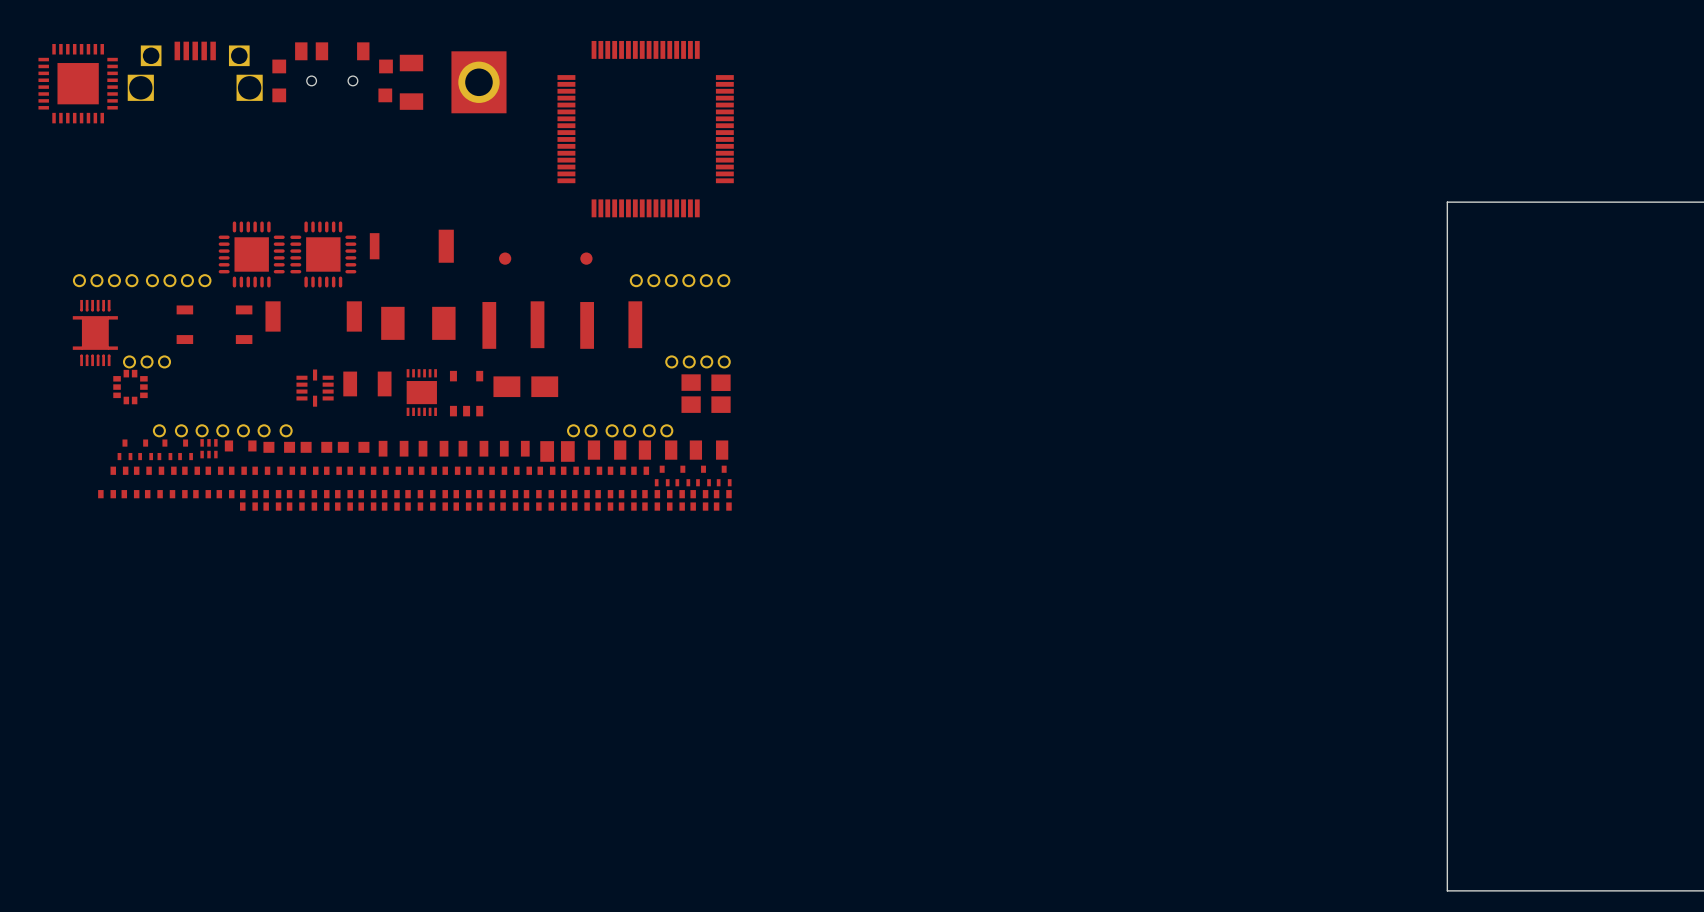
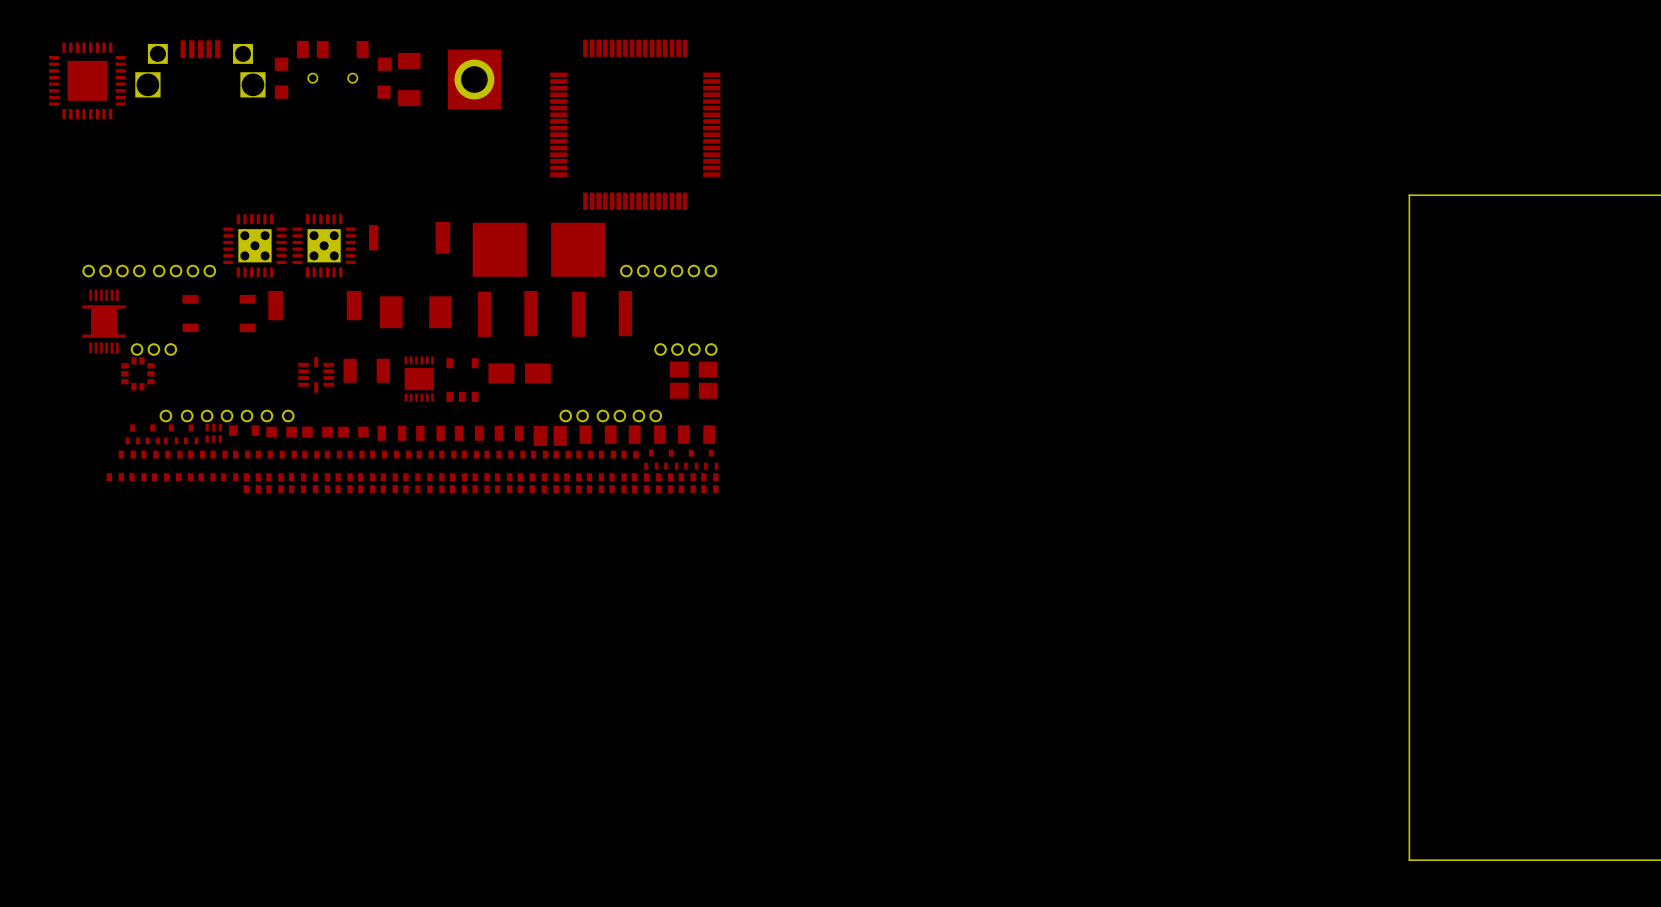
part footprint: [218, 221, 285, 288] -> [223, 213, 287, 278]
part footprint: [290, 221, 357, 288] -> [292, 213, 357, 278]
part footprint: [499, 252, 512, 265] -> [472, 222, 527, 277]
part footprint: [580, 252, 593, 265] -> [551, 222, 606, 277]

